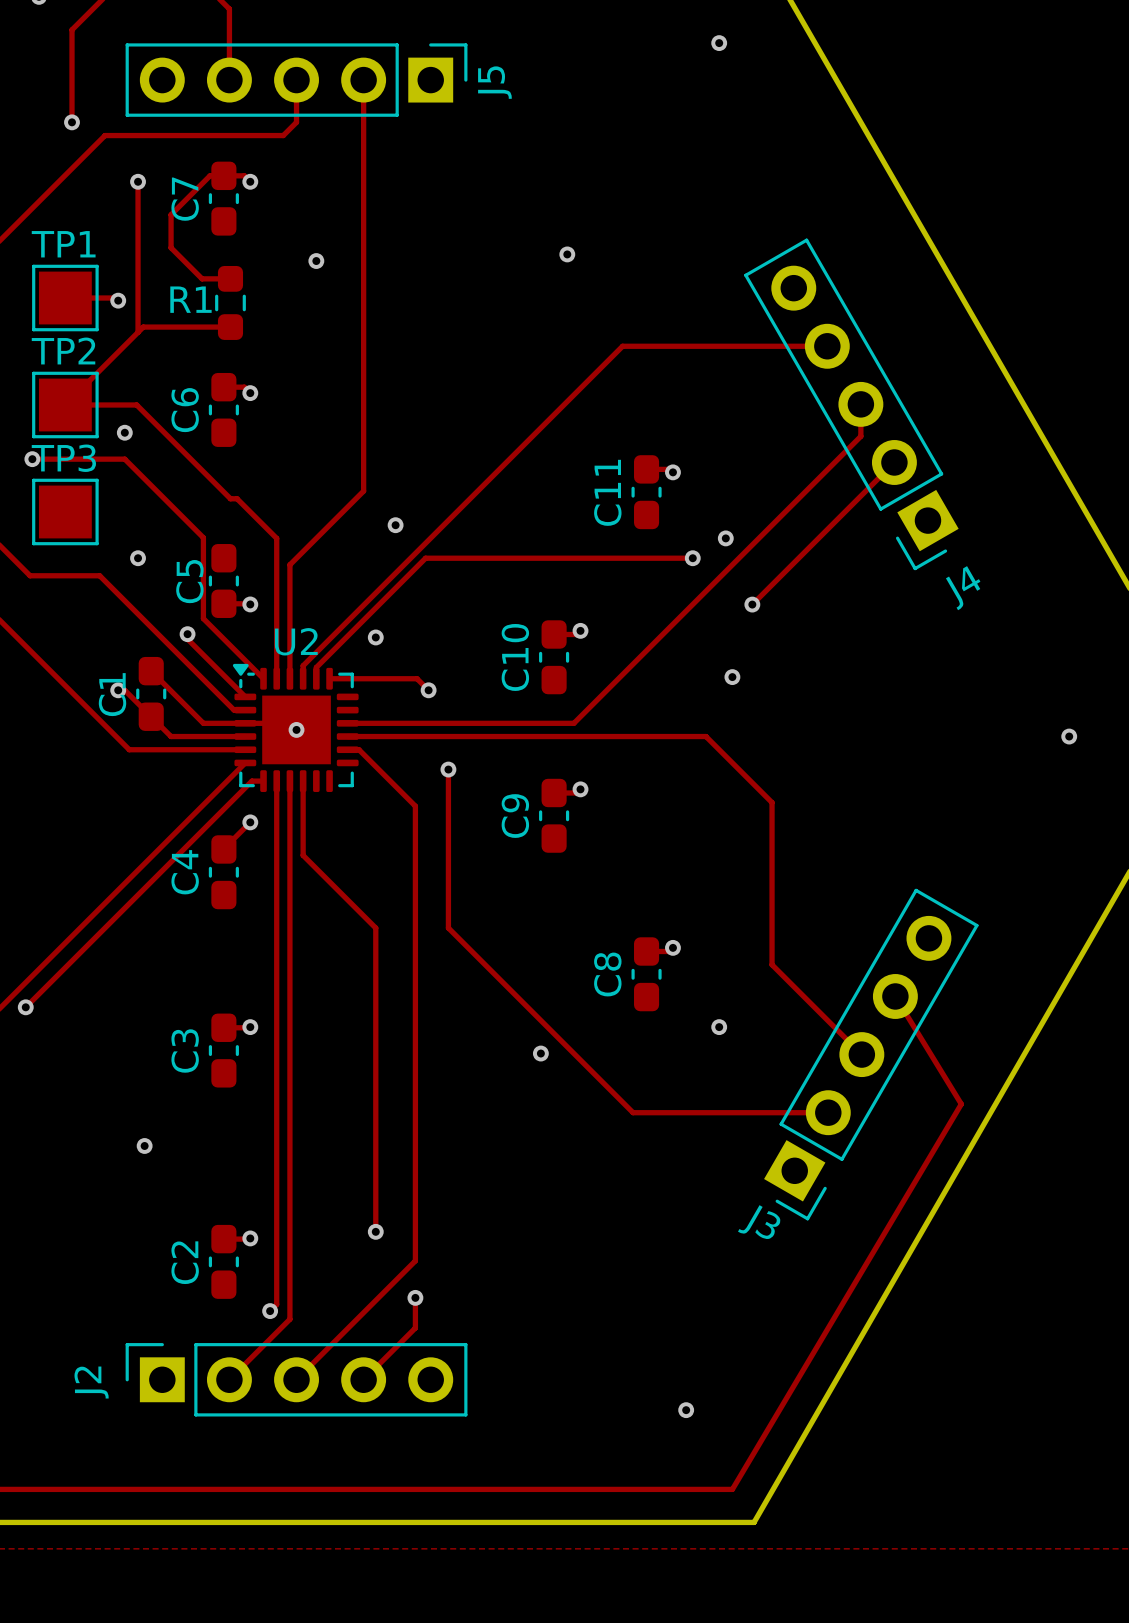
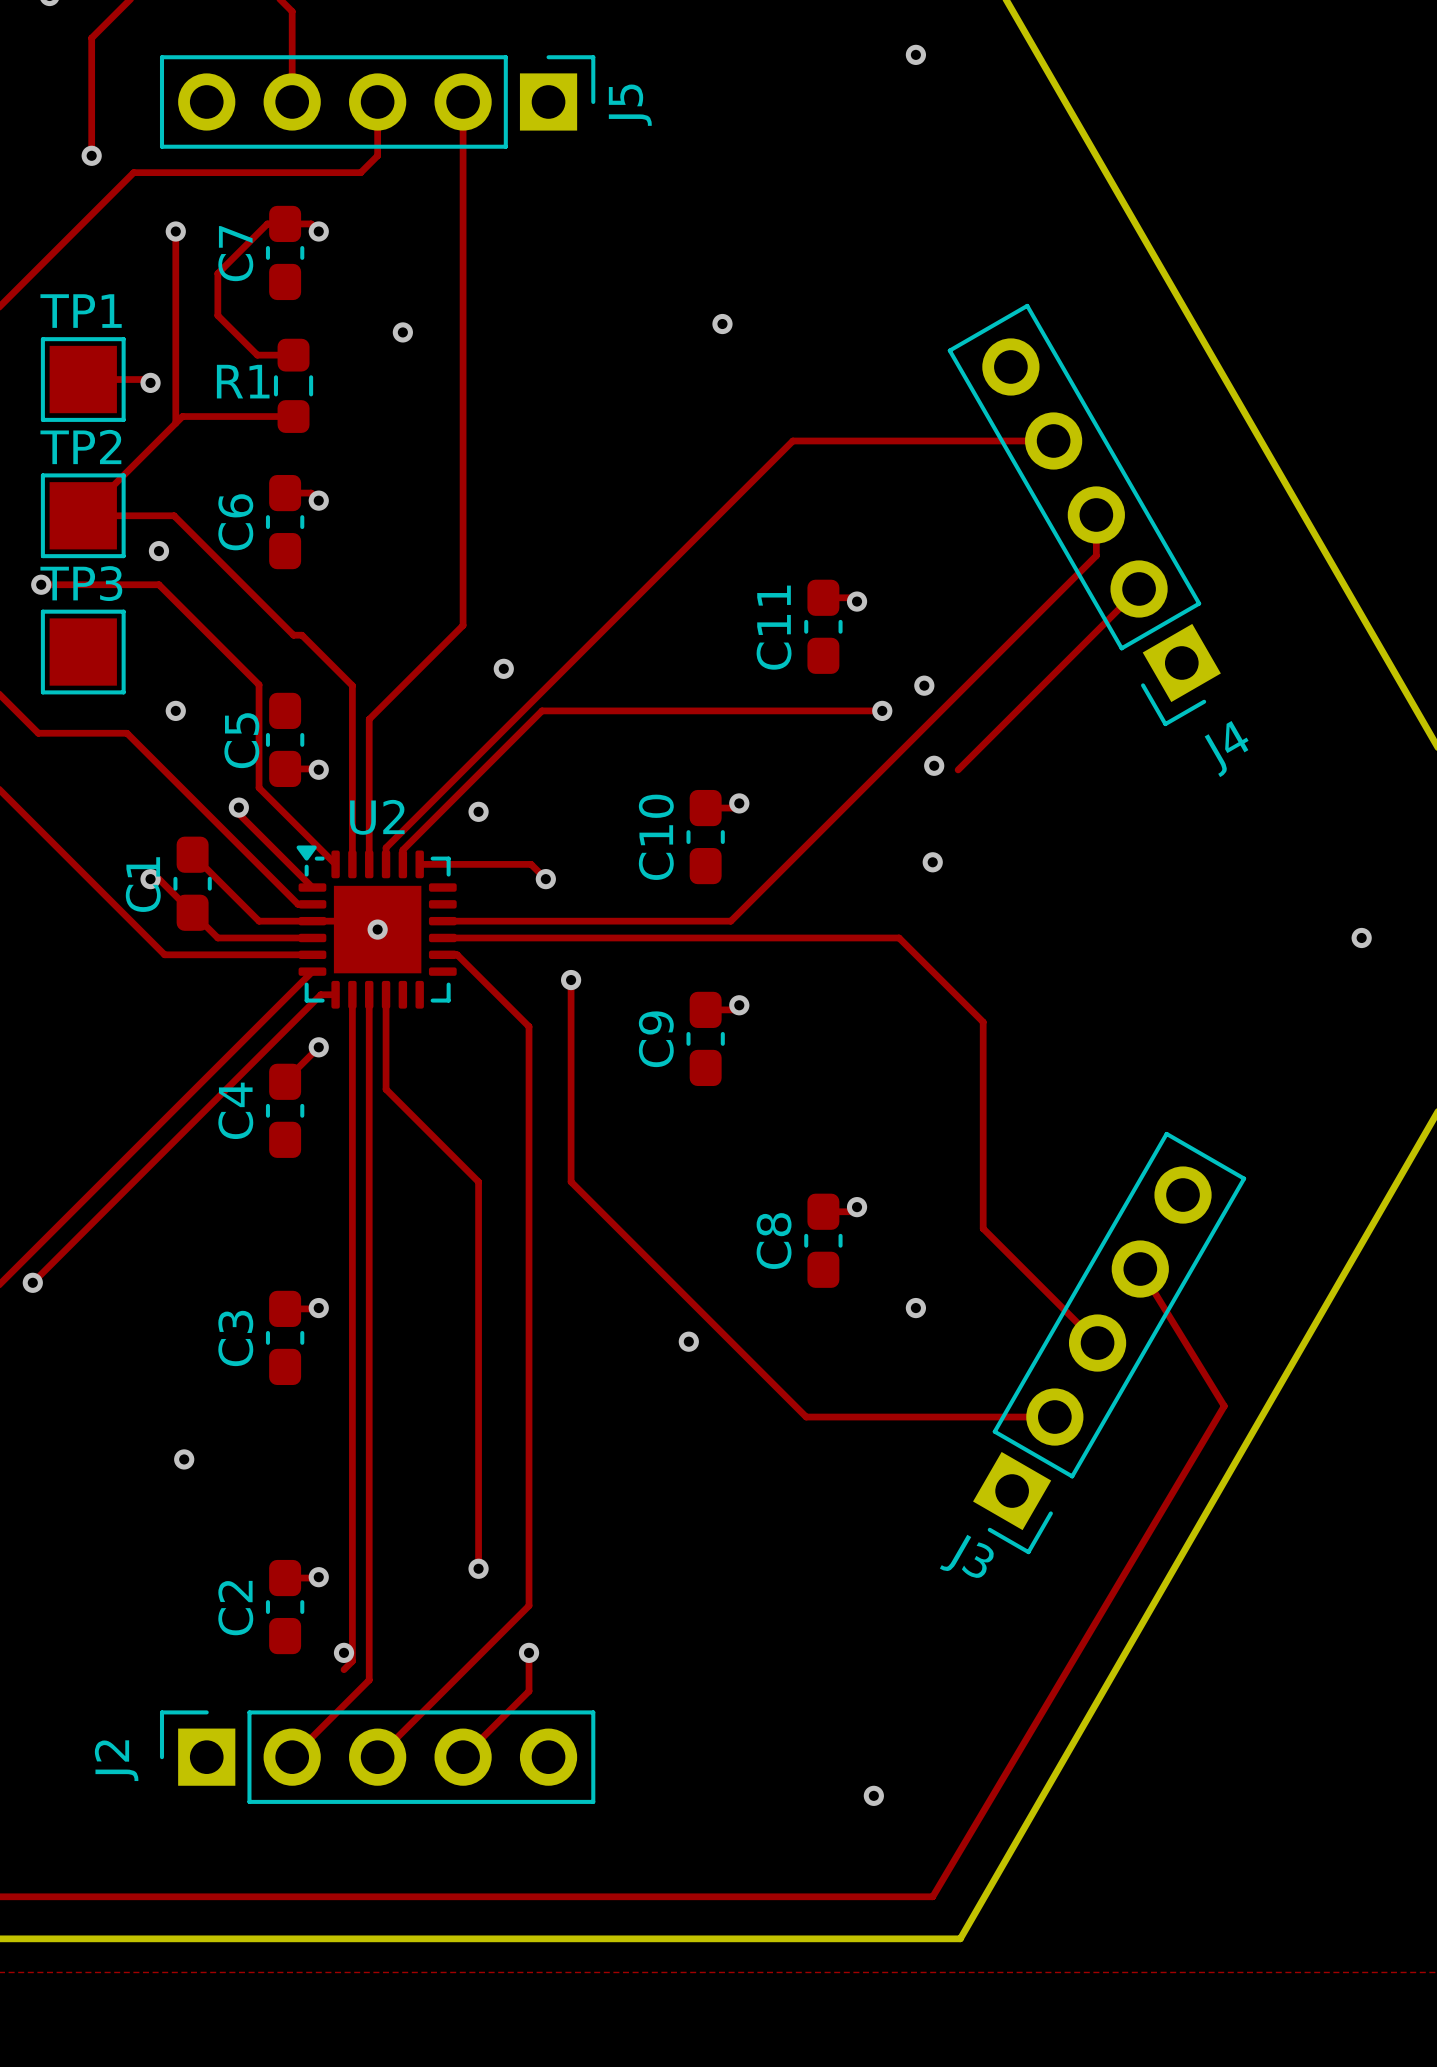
via position: (752, 604) -> (934, 765)
via position: (270, 1311) -> (344, 1652)

